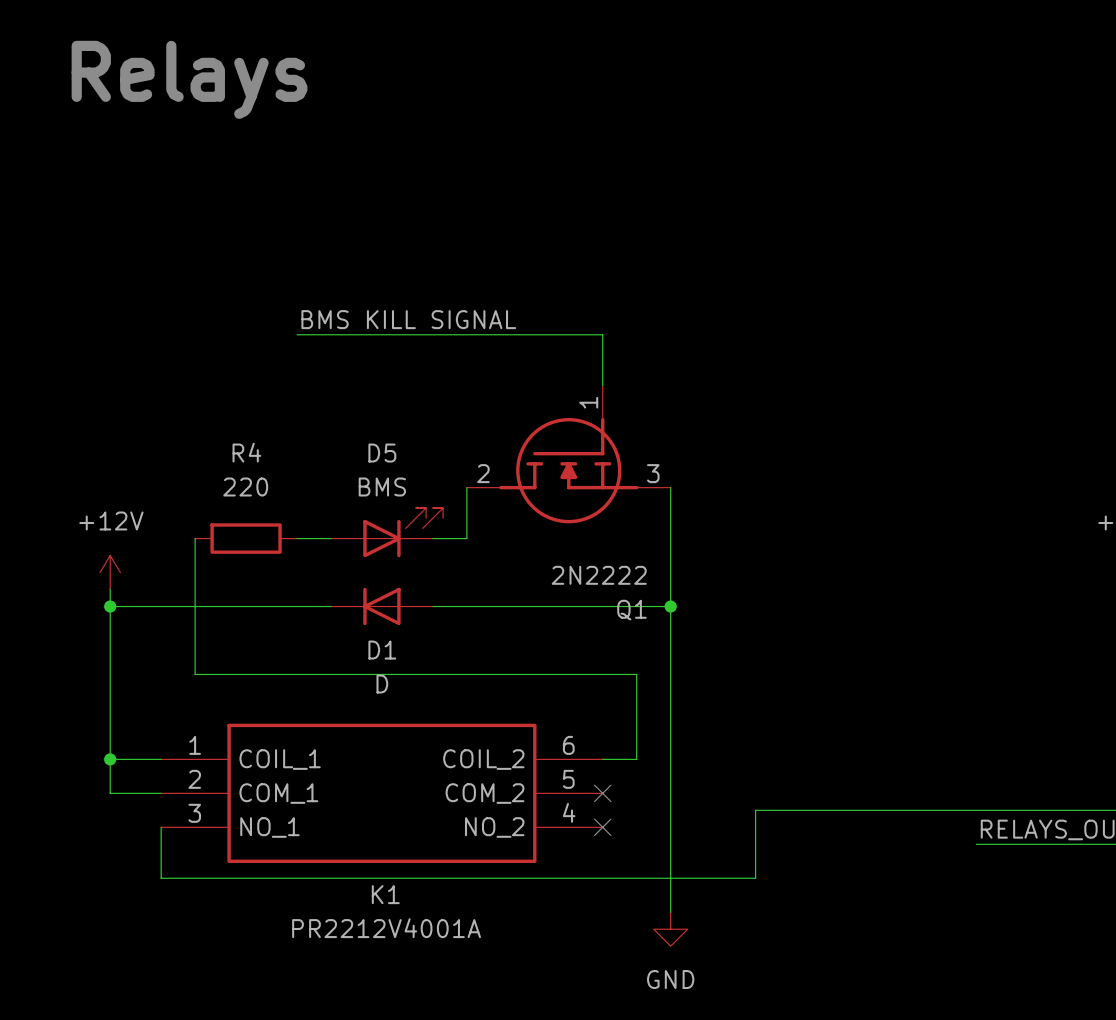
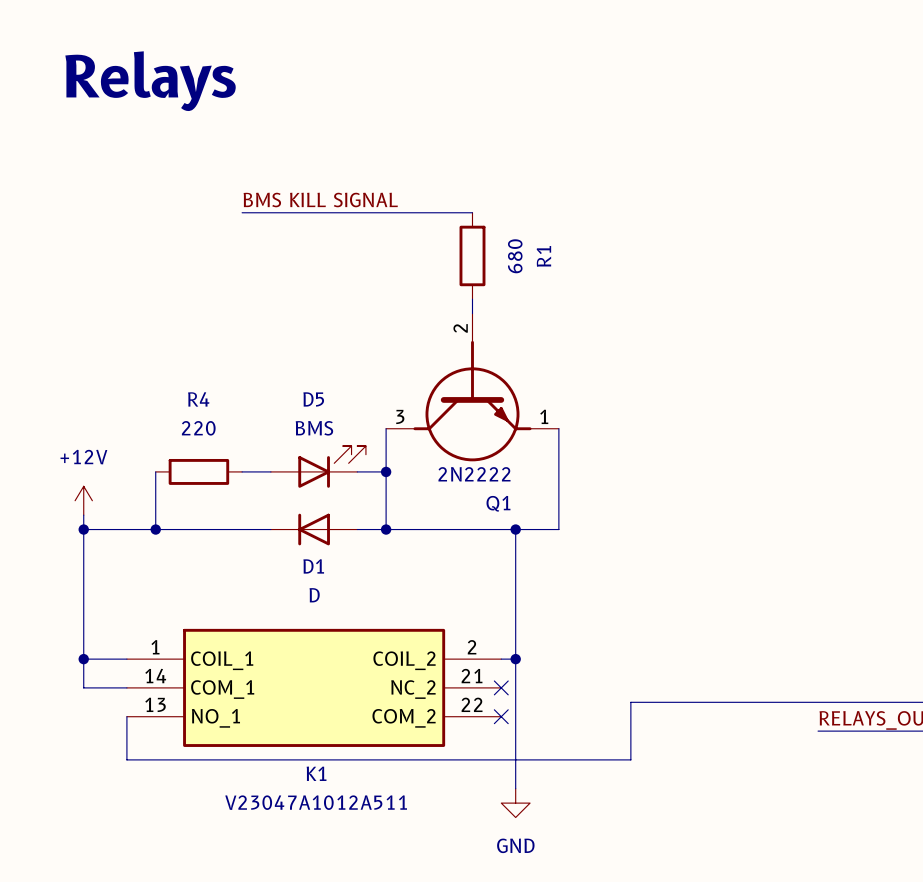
wire: none -> (242, 212) (472, 212)
R1: none -> 680 (472, 255)
label position: BMS KILL SIGNAL (408, 319) -> BMS KILL SIGNAL (320, 200)
wire: (297, 334) (602, 334) (602, 385) -> none
wire: none -> (472, 299) (472, 313)
Q1 symbol: [466, 385, 671, 524] -> [386, 313, 559, 462]
wire: none -> (386, 471) (386, 529)
junction: none -> (386, 471)
Q1 value position: 2N2222 (599, 575) -> 2N2222 (474, 474)
wire: (195, 606) (195, 674) (636, 674) (636, 759) (619, 759) -> none
junction: none -> (155, 529)
junction: none -> (386, 529)
wire: (670, 606) (670, 912) -> (515, 529) (515, 788)
junction position: (670, 606) -> (515, 529)
Q1 name position: Q1 (631, 610) -> Q1 (498, 503)
K1 pin number: 6 (568, 745) -> 2 (472, 647)
junction: none -> (515, 659)
K1 pin number: 2 (194, 779) -> 14 (155, 676)
K1 pin number: 5 (568, 779) -> 21 (472, 676)
K1 pin name: COM_2 (485, 793) -> NC_2 (413, 689)
K1 pin number: 4 (569, 812) -> 22 (472, 704)
K1 pin number: 3 (194, 813) -> 13 (155, 704)
K1 pin name: NO_2 (494, 827) -> COM_2 (404, 718)
K1 value: PR2212V4001A (386, 928) -> V23047A1012A511 (316, 802)
power symbol position: GND (670, 929) -> GND (515, 803)

